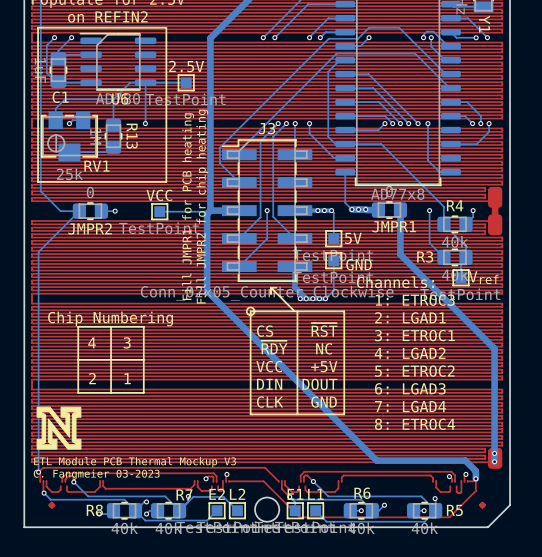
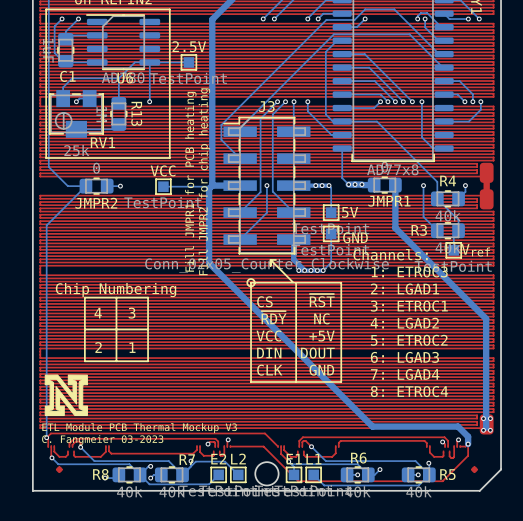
via: none -> (483, 418)
via: none -> (490, 418)
via: (494, 453) -> none
via: (494, 461) -> none
via: none -> (483, 430)
via: none -> (490, 430)

